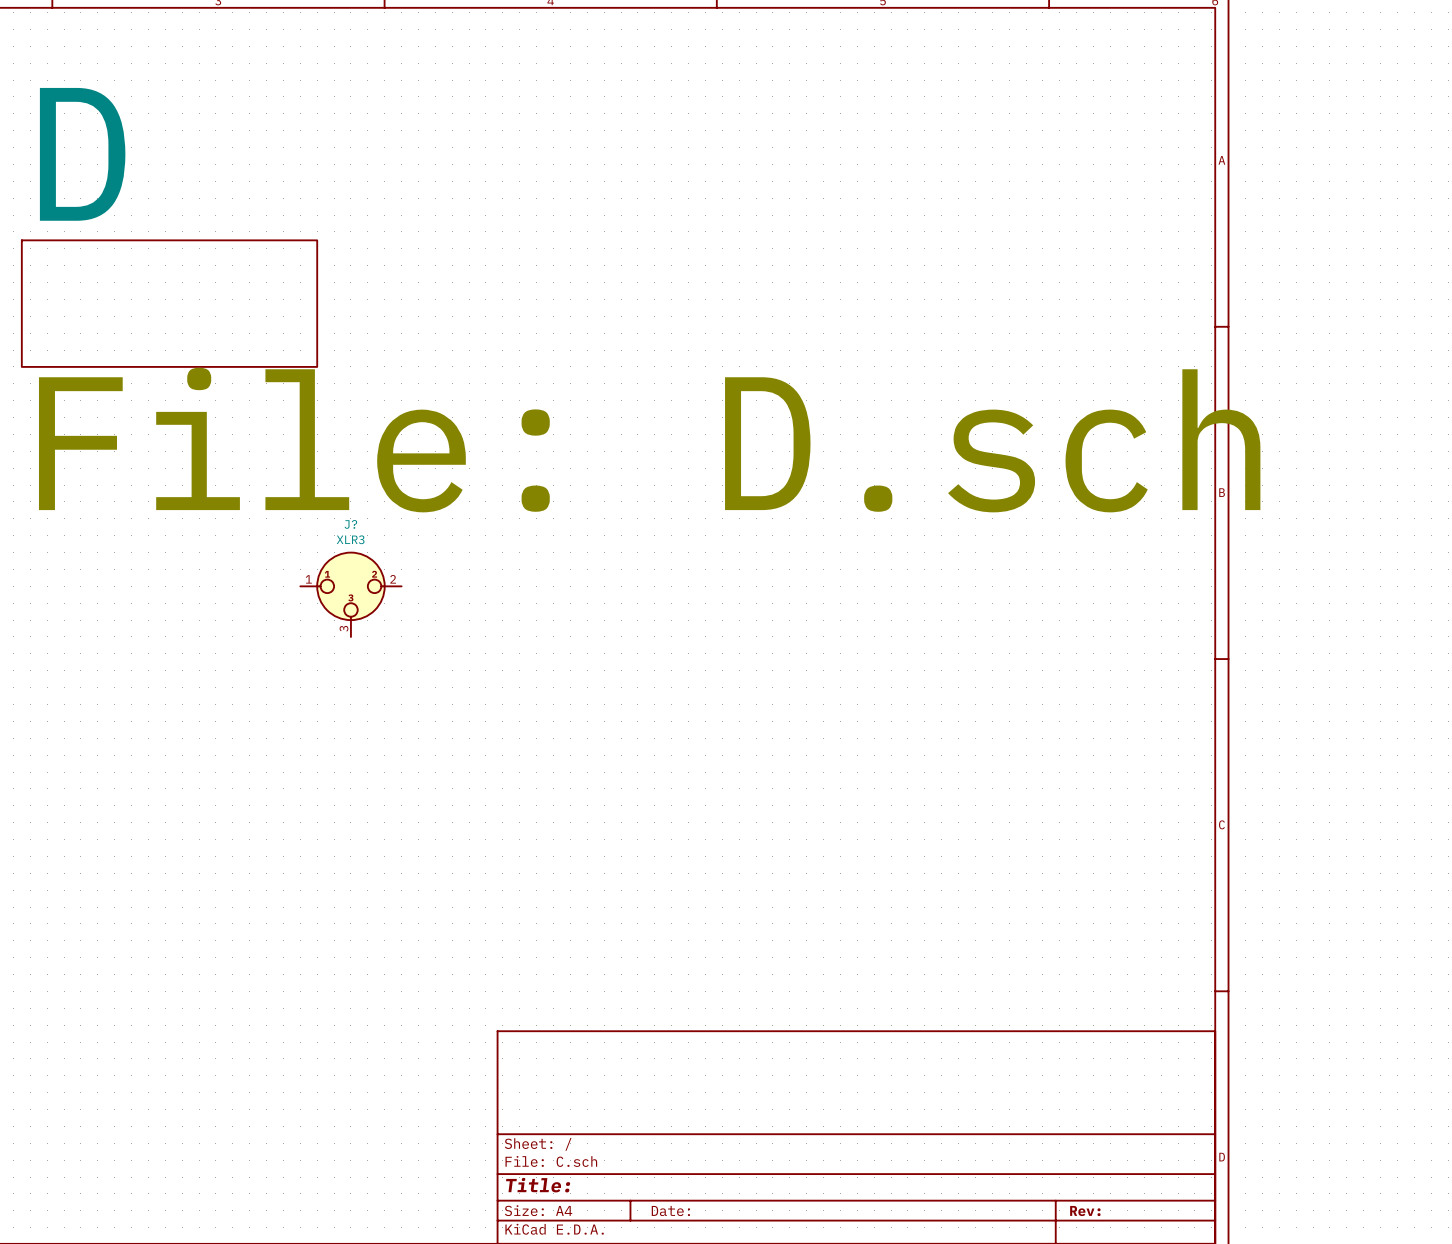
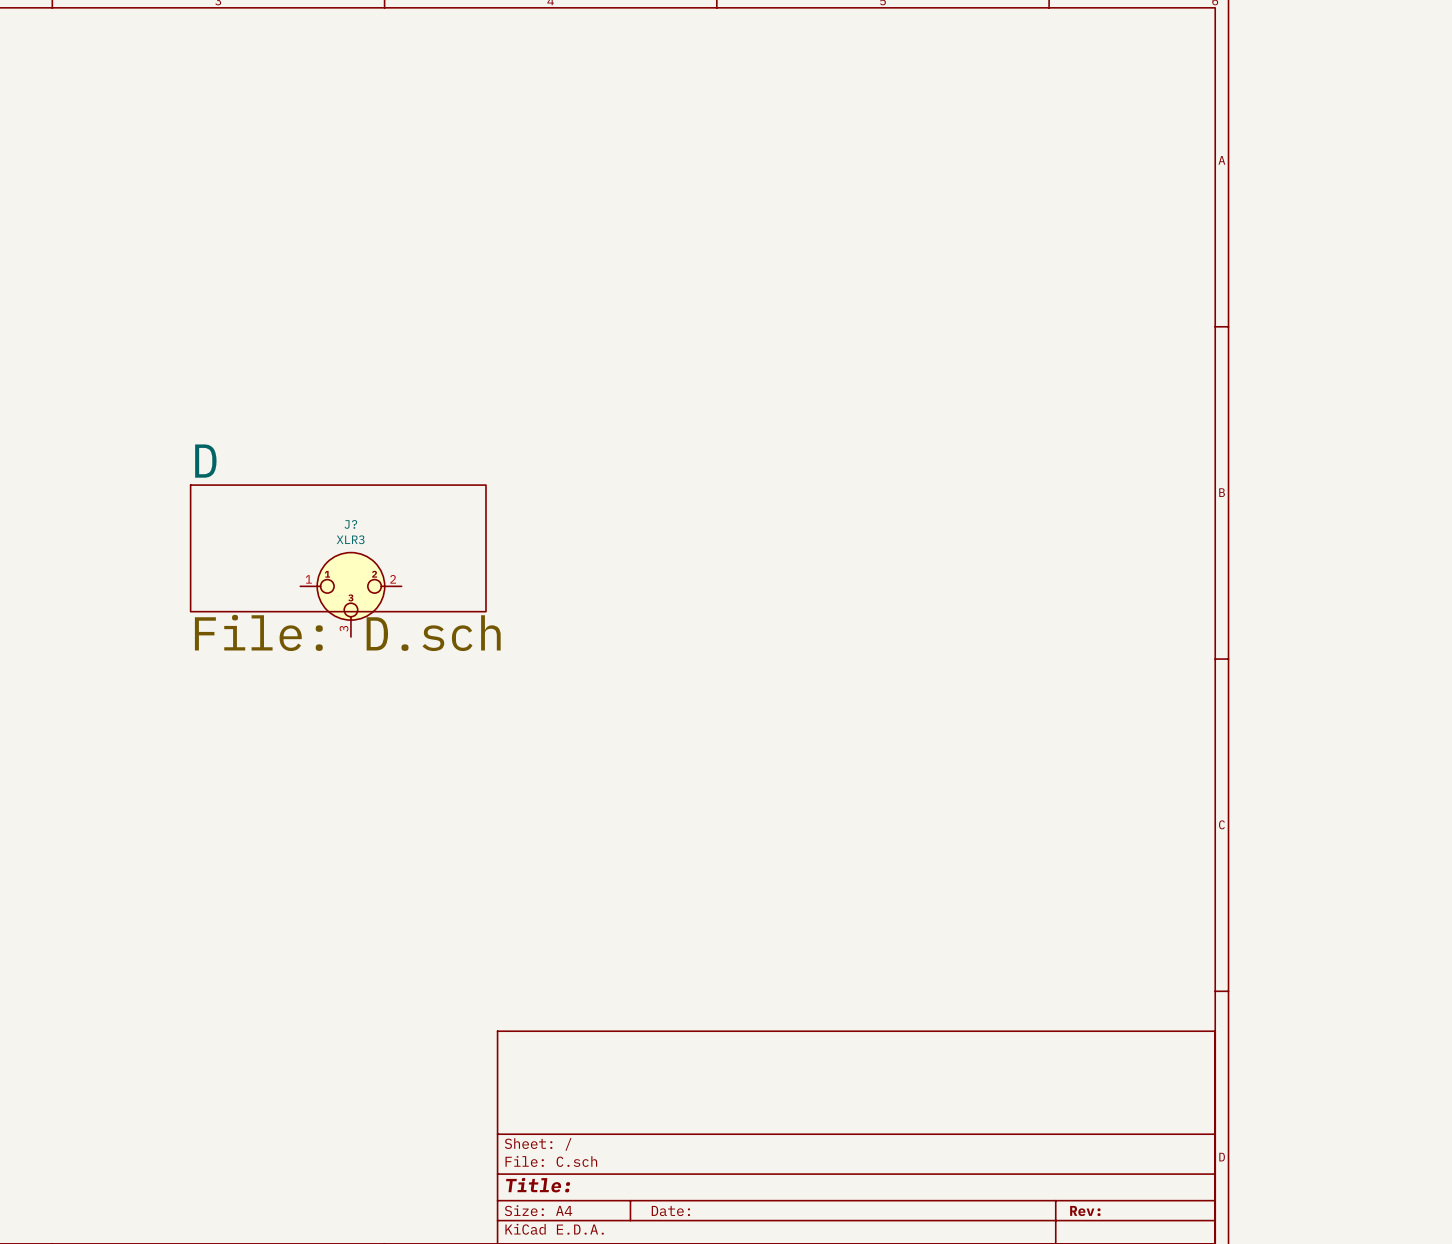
sheet D: File: D.sch (169, 303) -> none
sheet D: none -> File: D.sch (338, 548)

